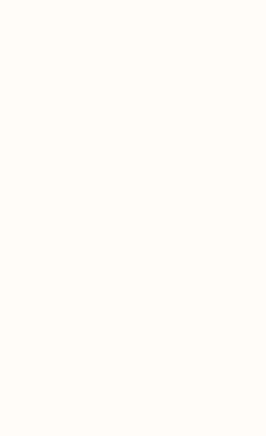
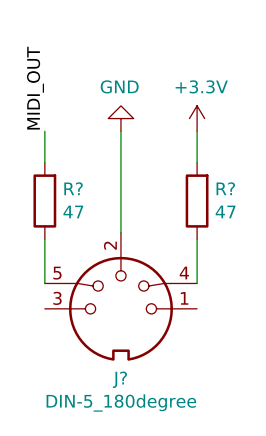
label: none -> MIDI_OUT (35, 88)
power symbol: none -> GND (120, 118)
power symbol: none -> +3.3V (197, 118)
wire: none -> (44, 131) (44, 162)
wire: none -> (120, 131) (120, 232)
wire: none -> (197, 131) (197, 162)
R?: none -> 47 (44, 201)
R?: none -> 47 (197, 201)
wire: none -> (44, 239) (44, 283)
wire: none -> (197, 239) (197, 283)
J?: none -> DIN-5_180degree (120, 296)

